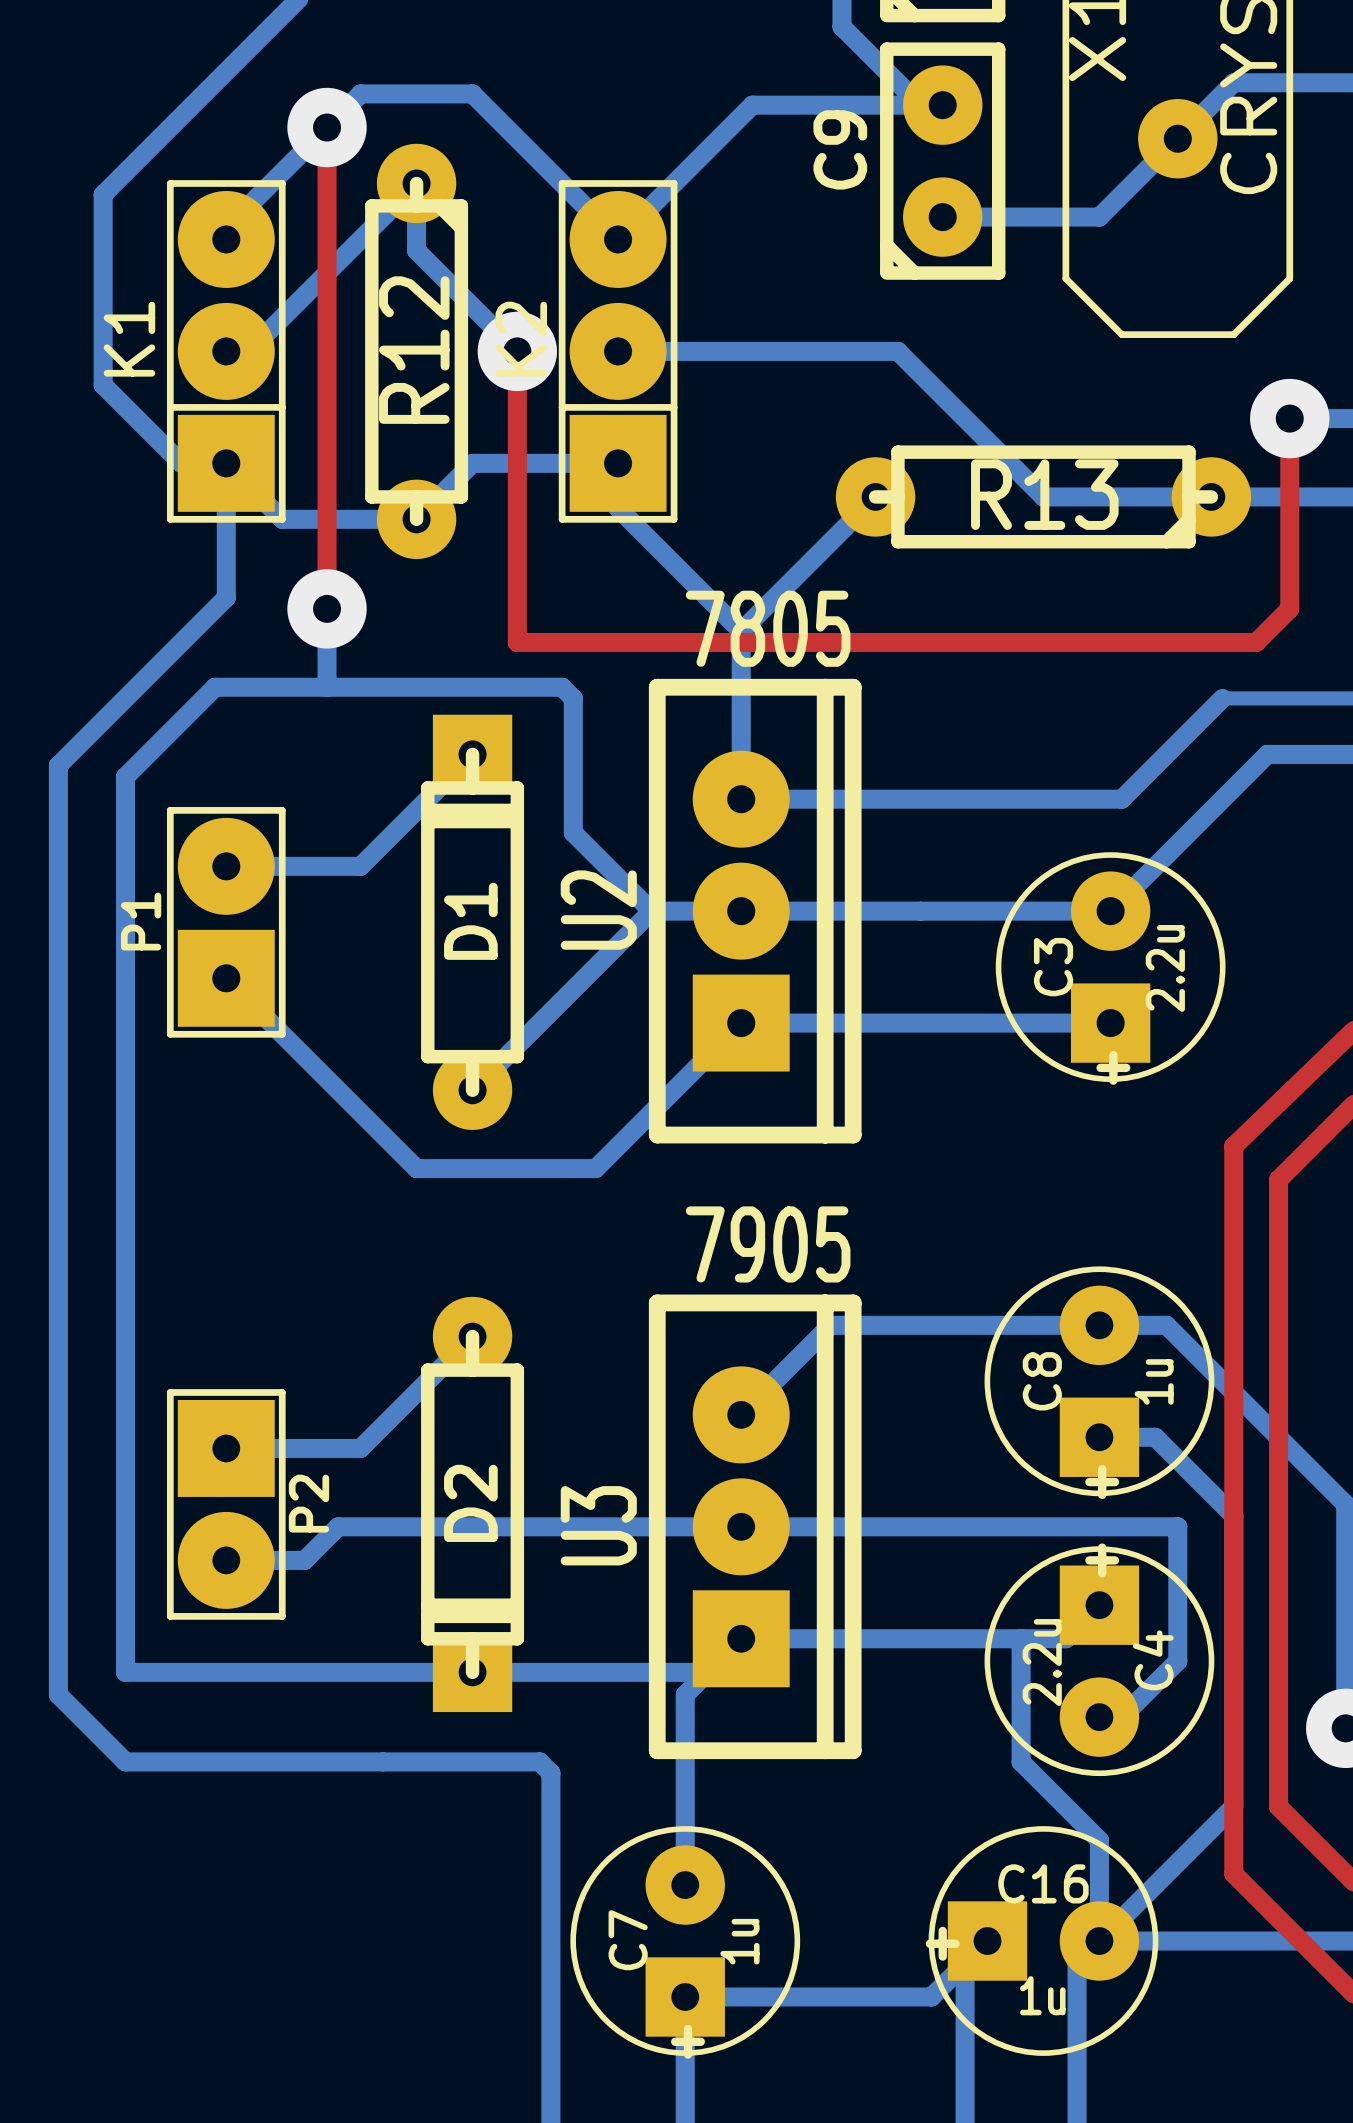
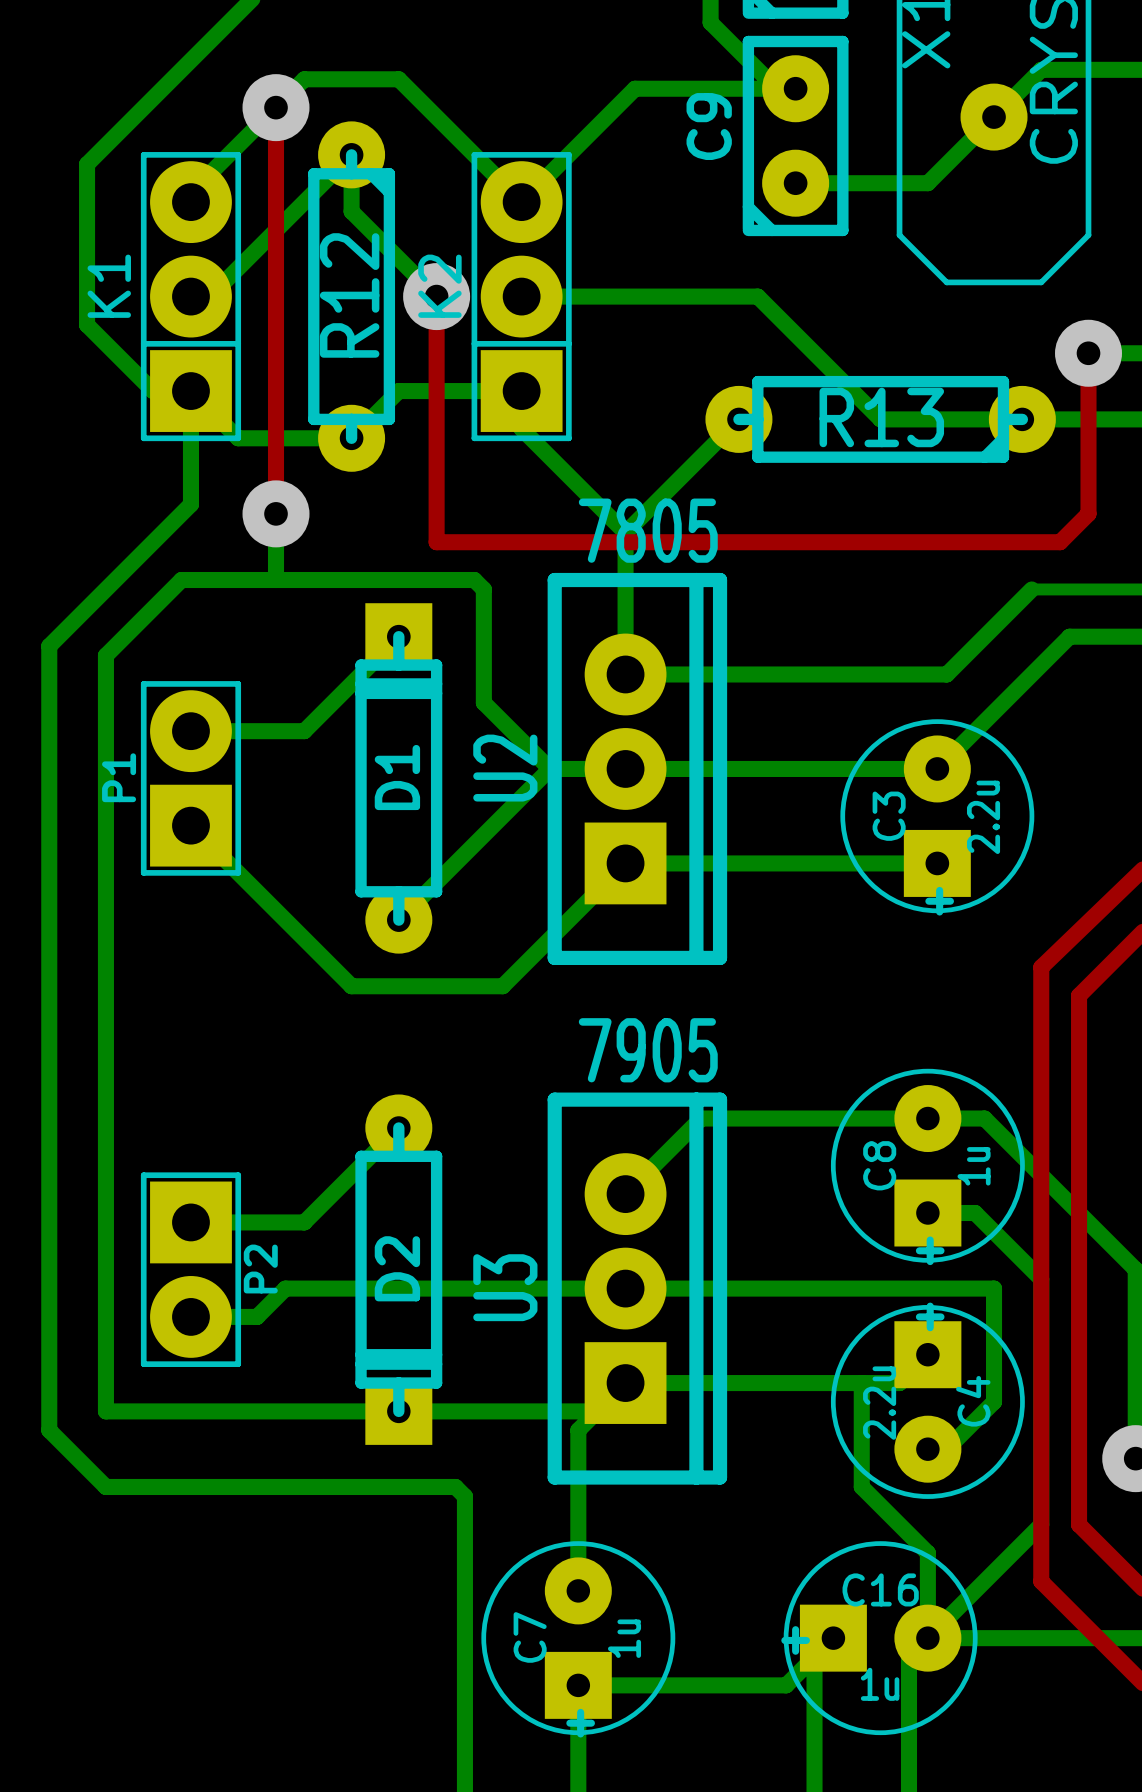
K1 footprint: [166, 180, 286, 523] -> [140, 152, 242, 442]
K2 footprint: [558, 180, 678, 523] -> [471, 152, 572, 442]
U2 footprint: [648, 678, 862, 1144] -> [547, 572, 728, 966]
P1 footprint: [166, 807, 286, 1038] -> [140, 681, 242, 876]
U3 footprint: [648, 1294, 862, 1760] -> [547, 1092, 728, 1485]
P2 footprint: [166, 1389, 286, 1620] -> [140, 1172, 242, 1368]

